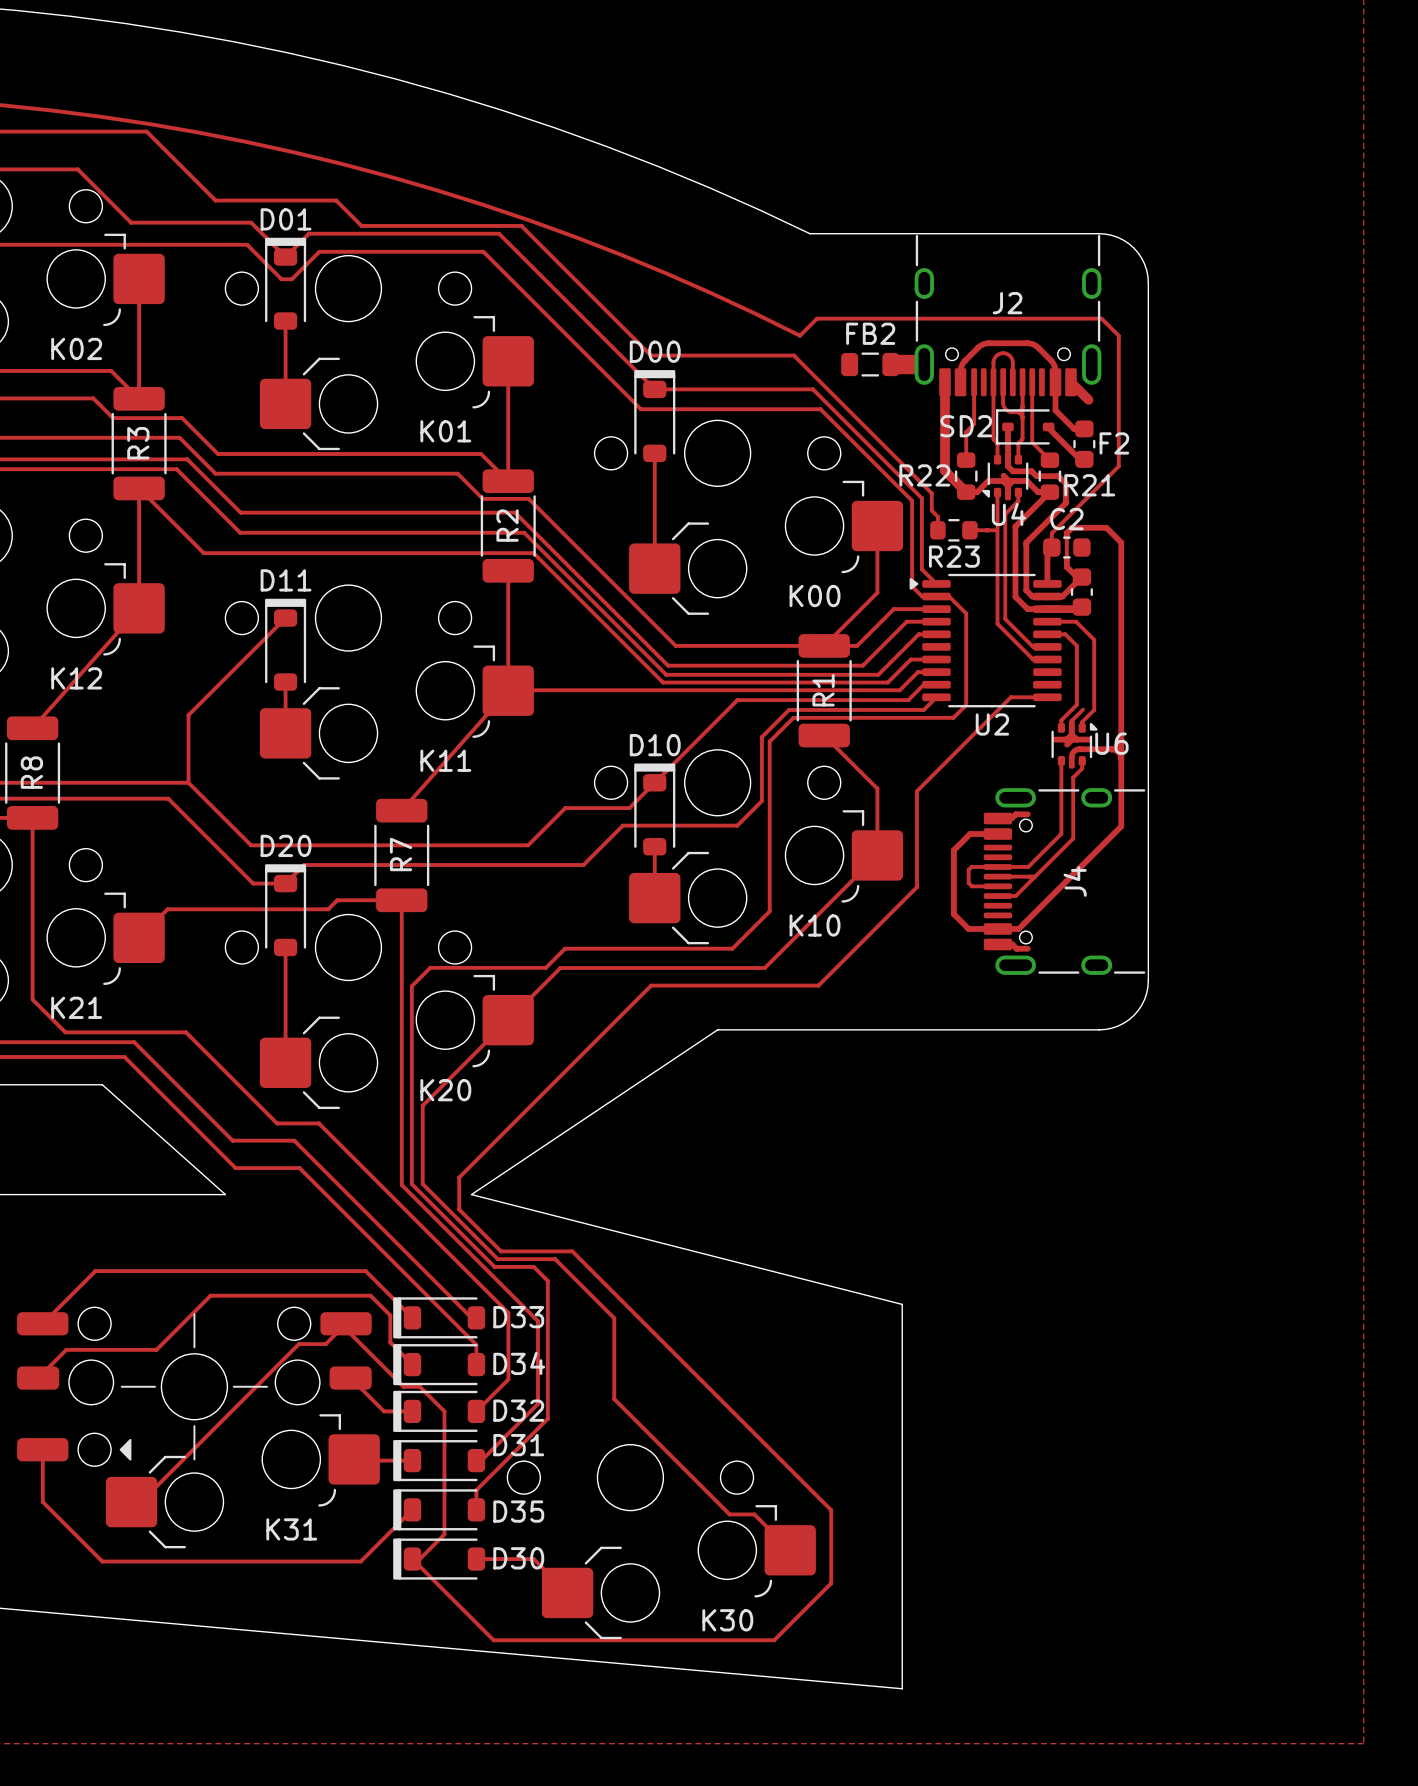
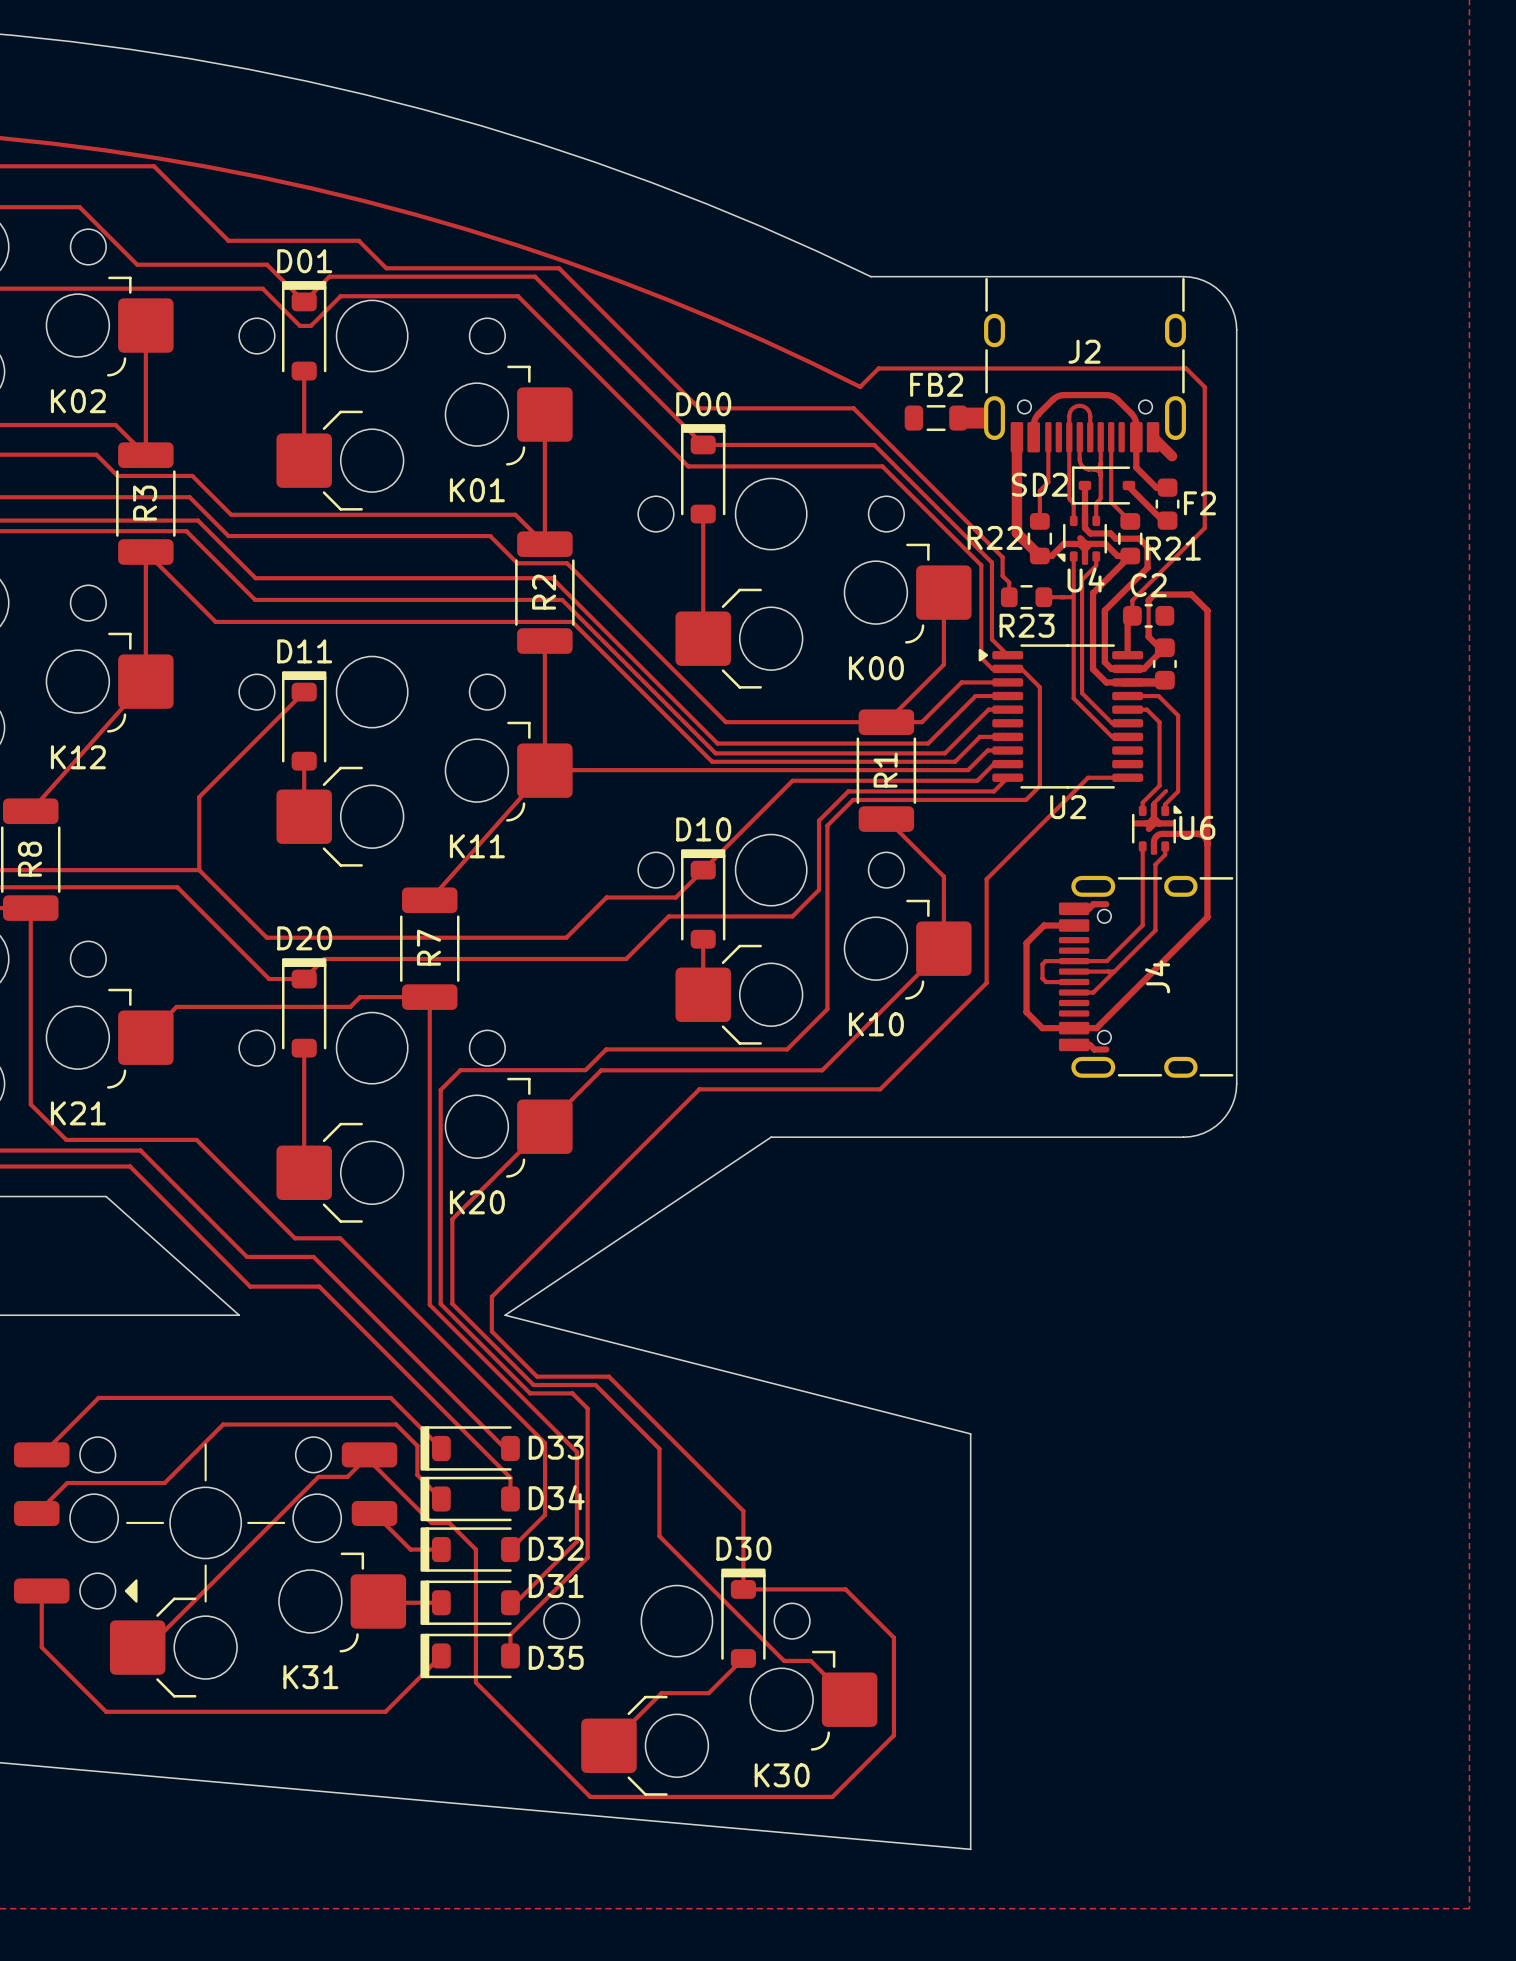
top track: (567, 1251) (572, 1251) (831, 1510) -> (608, 1376) (743, 1511) (743, 1589) (845, 1589) (893, 1637) (893, 1656)
top track: (444, 1534) (419, 1559) (412, 1559) (493, 1640) (550, 1640) -> (475, 1682) (590, 1796)
D30 name position: D30 (518, 1558) -> D30 (743, 1548)
D30 rotation: 0° (439, 1559) -> 90° clockwise (743, 1618)
D30 position: (439, 1559) -> (743, 1618)
top track: (476, 1559) (533, 1559) (567, 1592) -> (743, 1658) (708, 1693) (661, 1693) (608, 1745)

